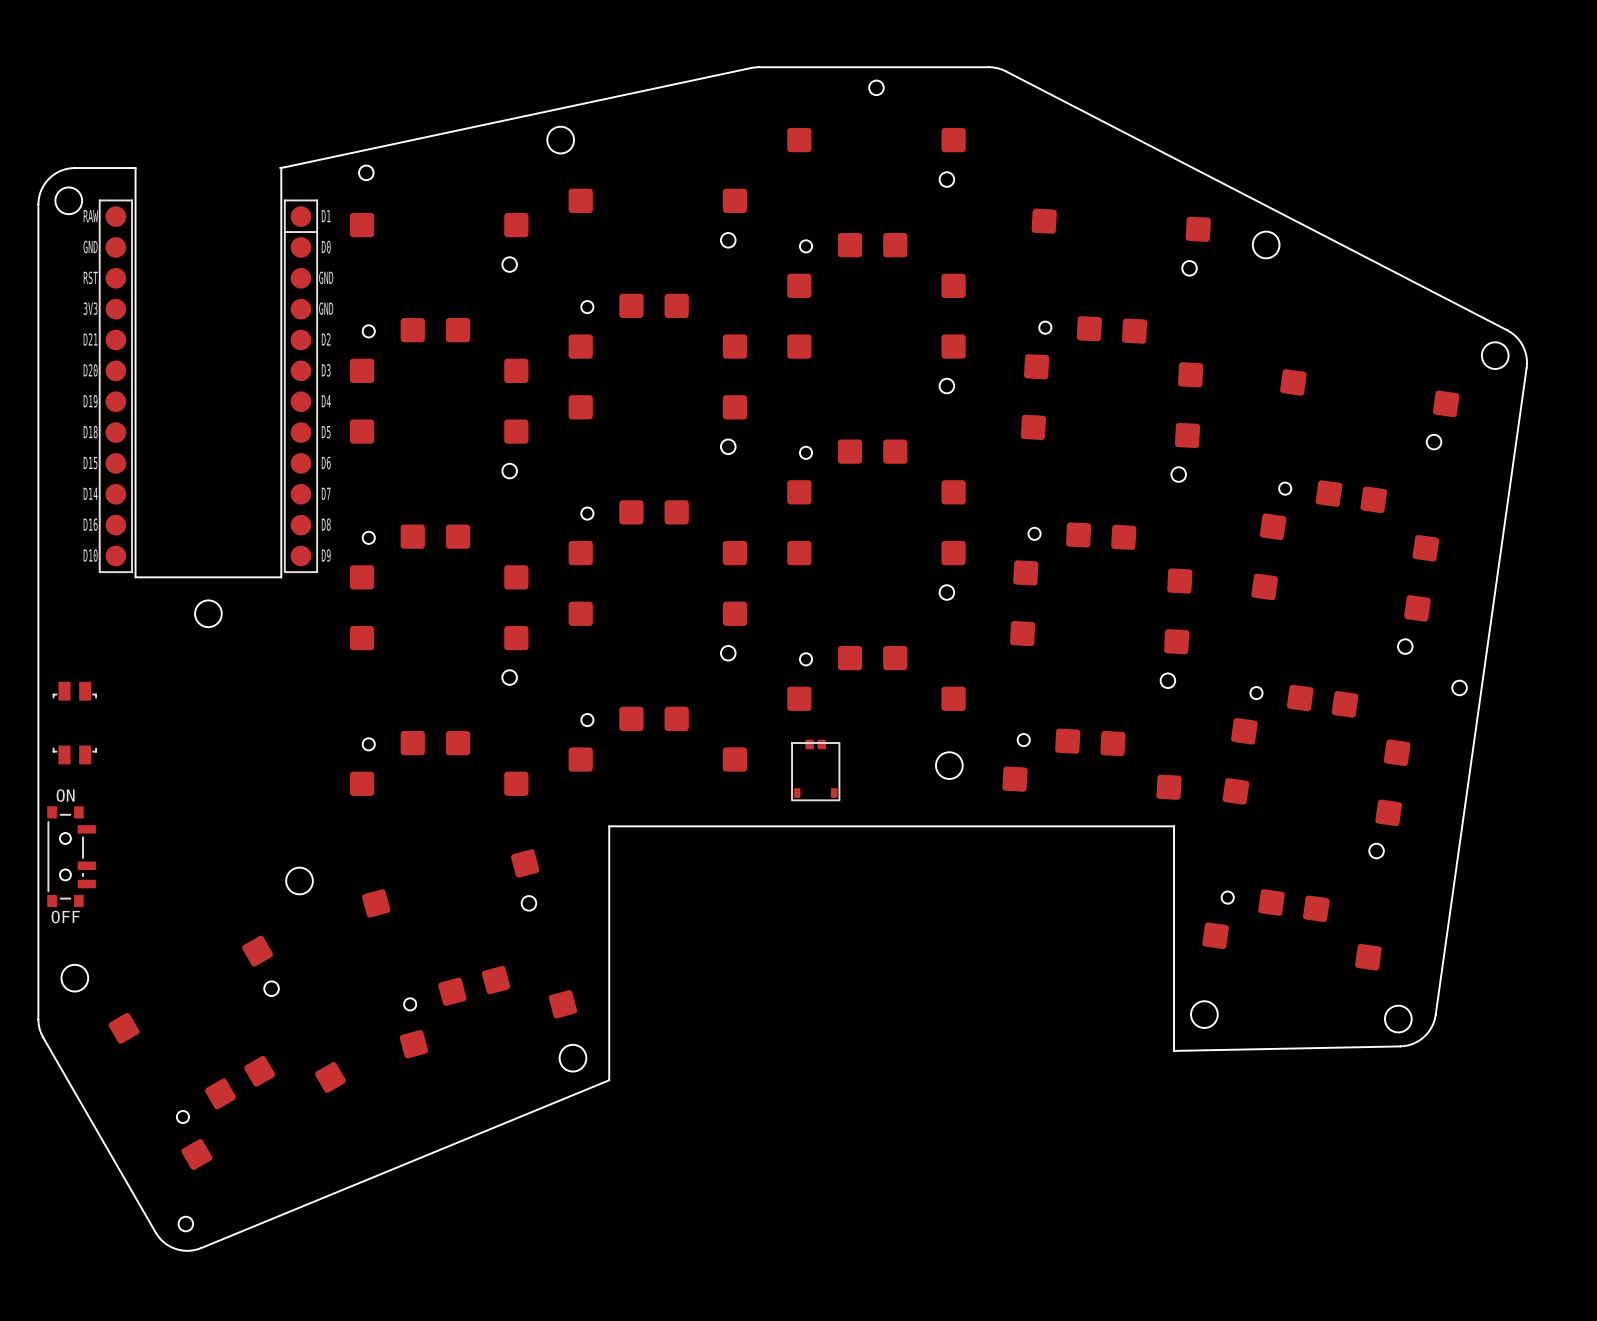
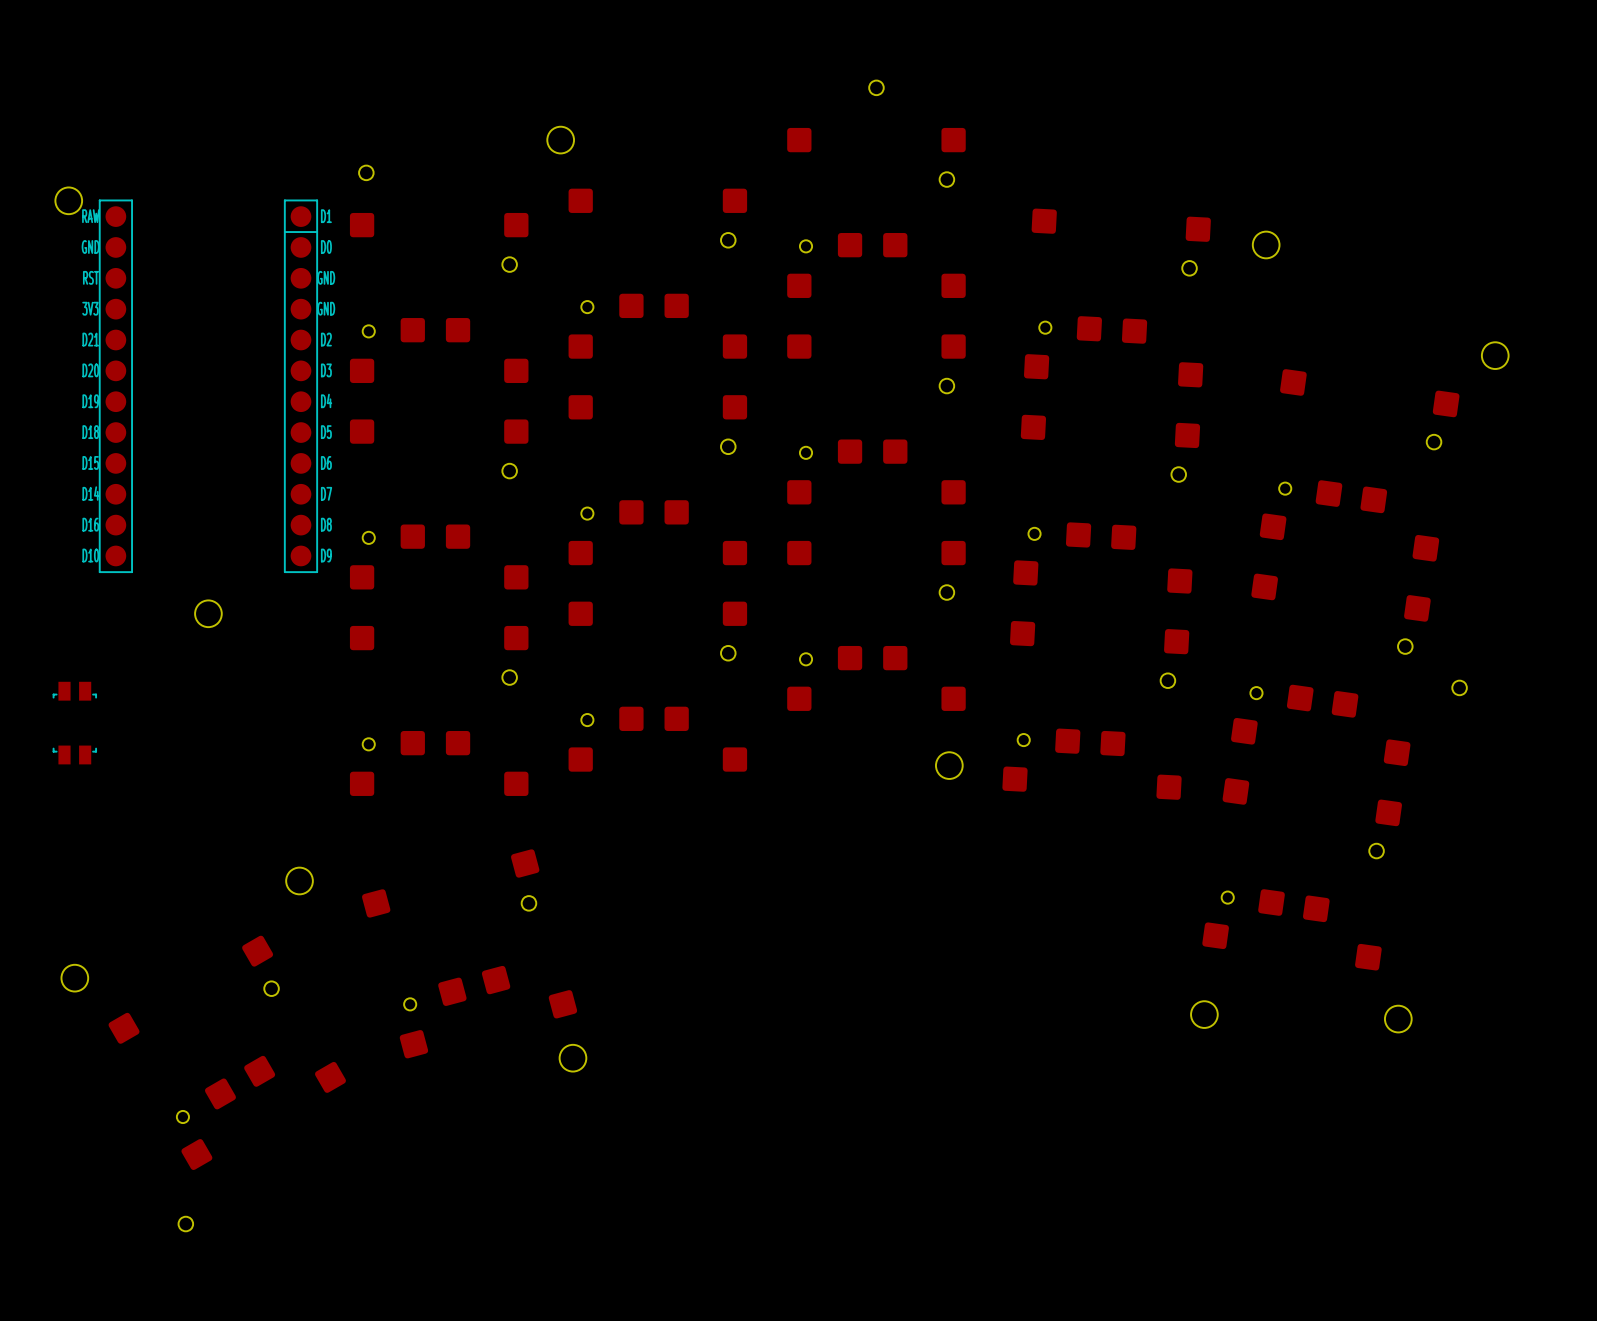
board edge: (758, 67) (989, 67) (1001, 69) (1507, 330) (1520, 342) (1526, 354) (1526, 367) (1435, 1015) (1431, 1027) (1420, 1039) (1404, 1046) (1174, 1050) (1174, 826) (609, 826) (609, 1080) (201, 1248) (184, 1250) (171, 1247) (160, 1239) (155, 1232) (43, 1037) (38, 1024) (38, 204) (43, 186) (52, 175) (70, 168) (135, 168) (135, 577) (281, 577) (280, 167) (758, 67) -> none
part: (815, 770) -> none
part: (71, 856) -> none

